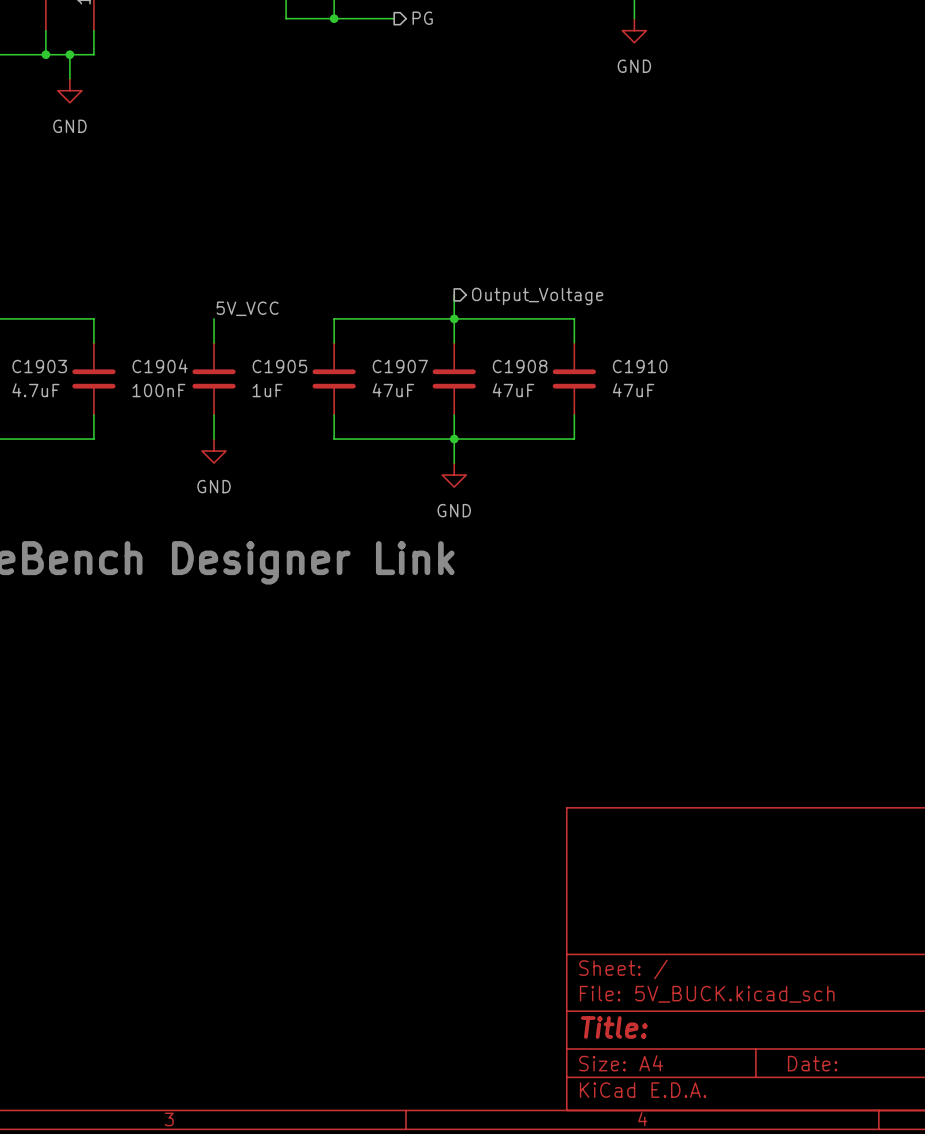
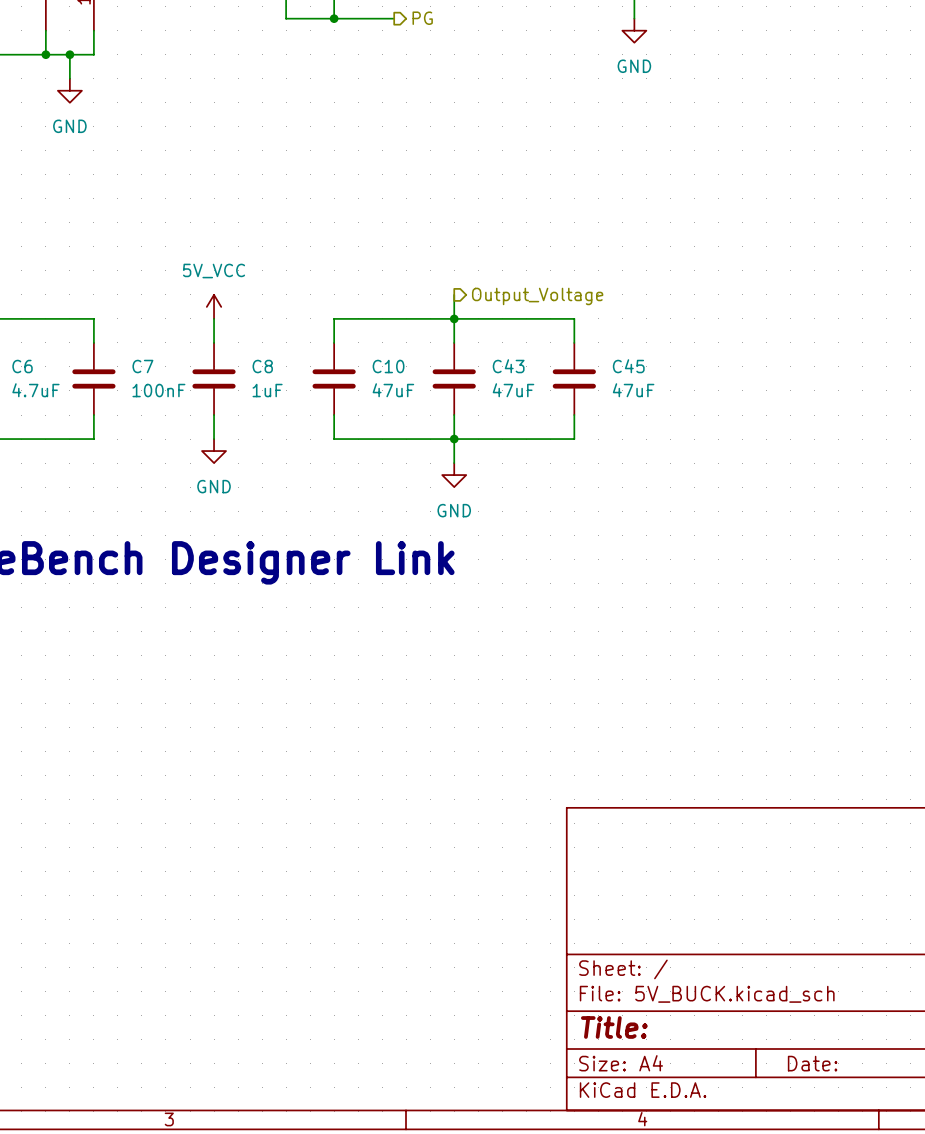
power symbol: none -> 5V_VCC (214, 306)
label: 5V_VCC (247, 308) -> none
C1903 name: C1903 (39, 366) -> C6 (22, 366)
C1904 name: C1904 (160, 366) -> C7 (142, 366)
C1905 name: C1905 (279, 366) -> C8 (262, 366)
C1907 name: C1907 (400, 366) -> C10 (388, 366)
C1908 name: C1908 (520, 366) -> C43 (508, 366)
C1910 name: C1910 (640, 366) -> C45 (628, 366)

